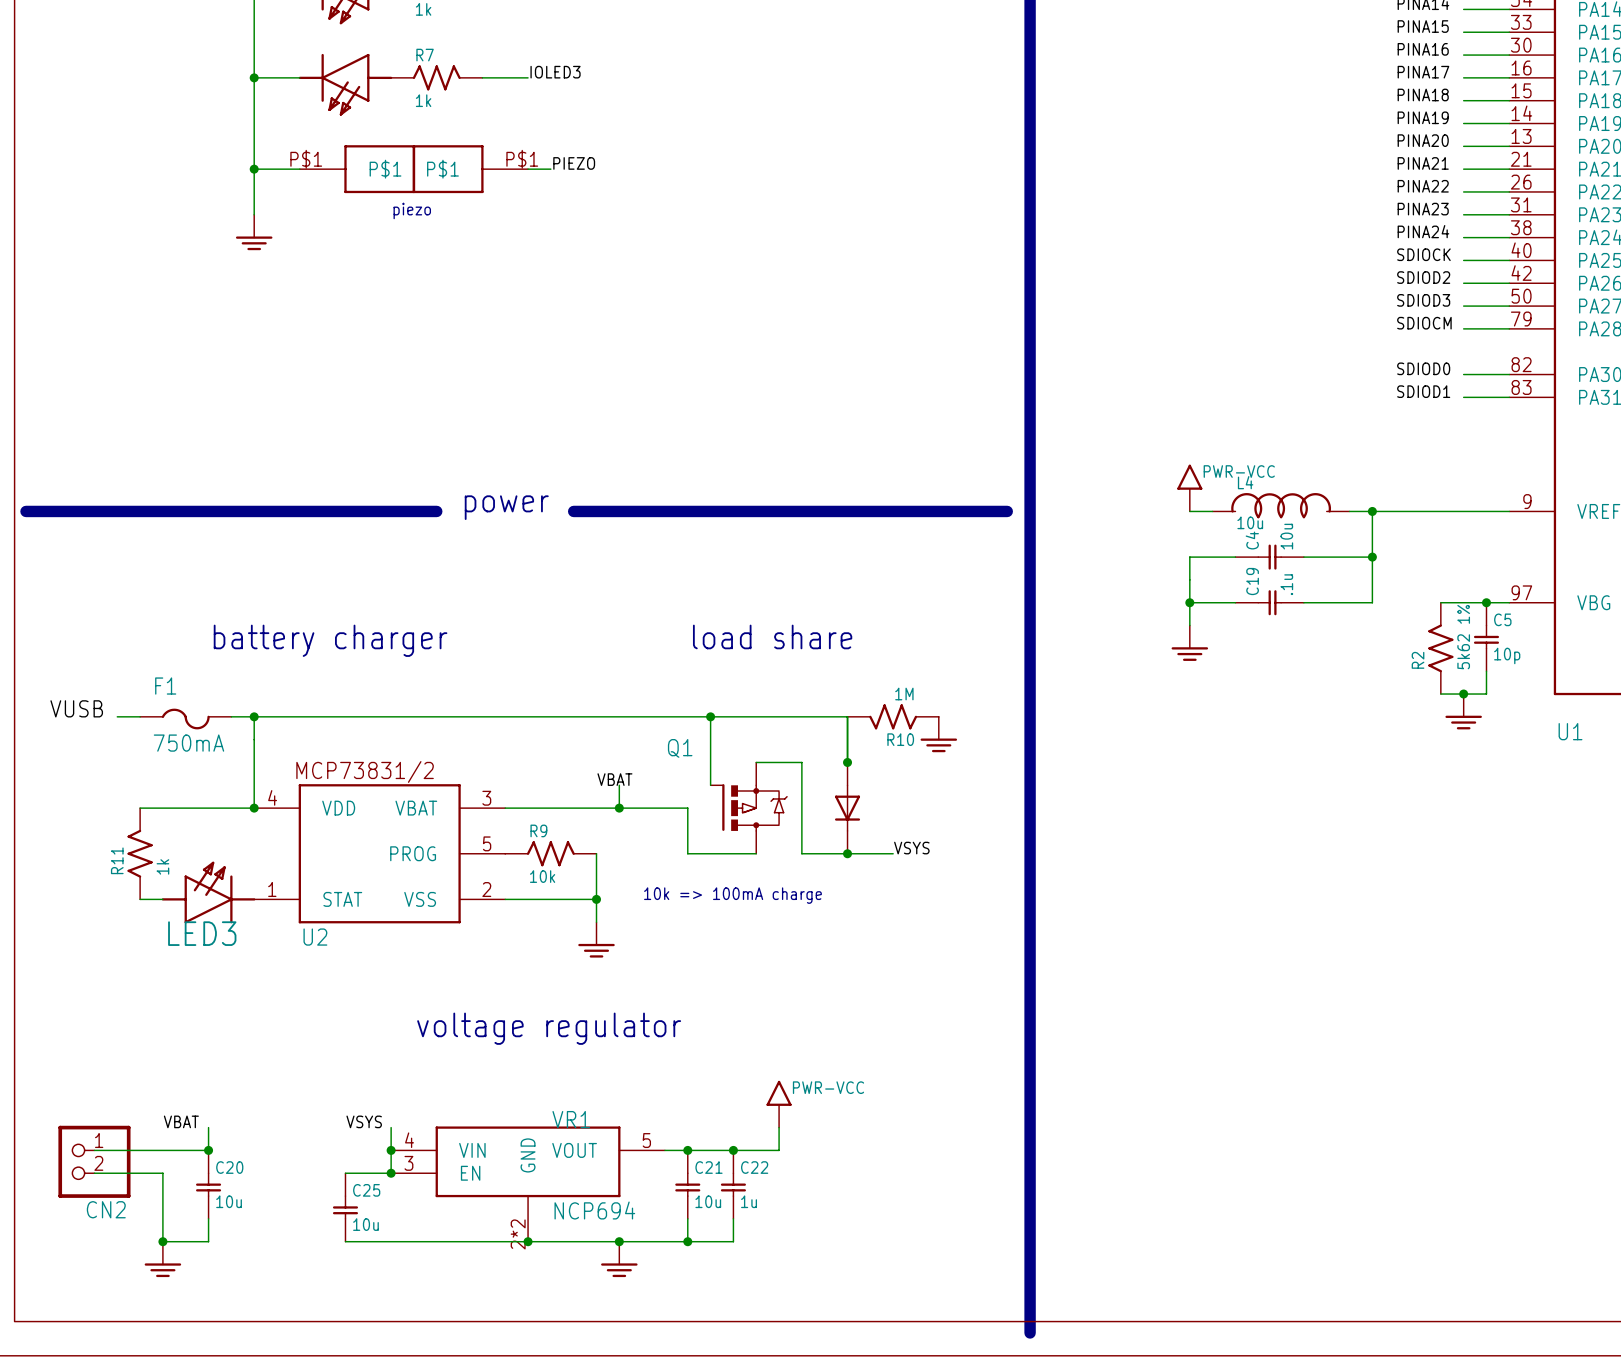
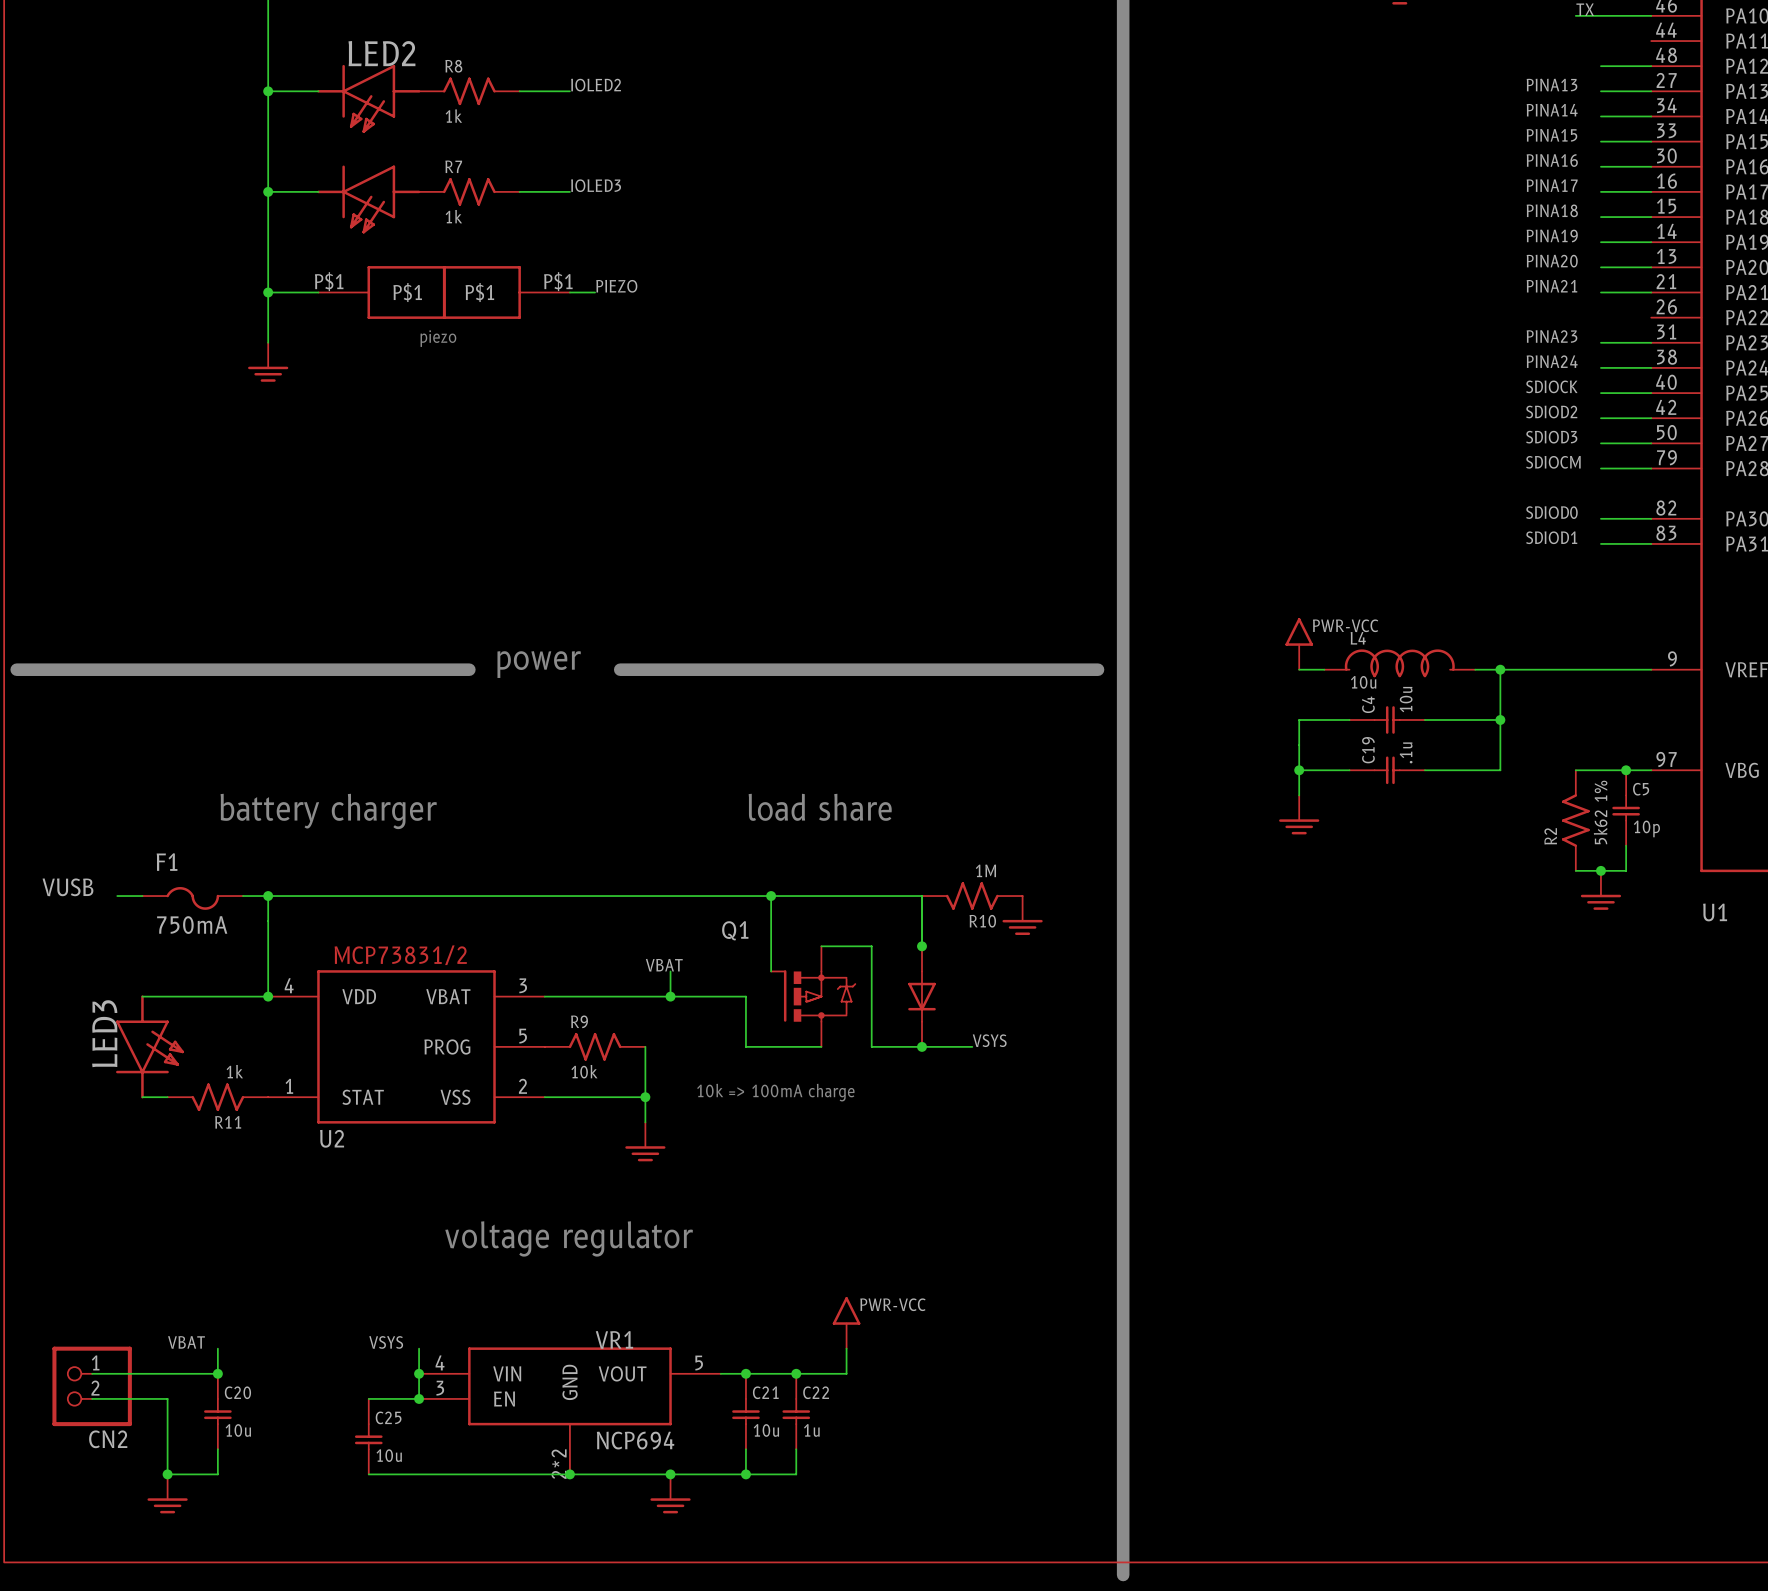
label: PINA22 (1423, 186) -> none
wire: (1463, 191) (1509, 191) -> none
R11 rotation: 0° (140, 853) -> 90° counterclockwise (217, 1097)
R11 position: (140, 853) -> (217, 1097)
LED3 rotation: 0° (208, 892) -> 90° clockwise (149, 1046)
LED3 position: (208, 892) -> (149, 1046)

